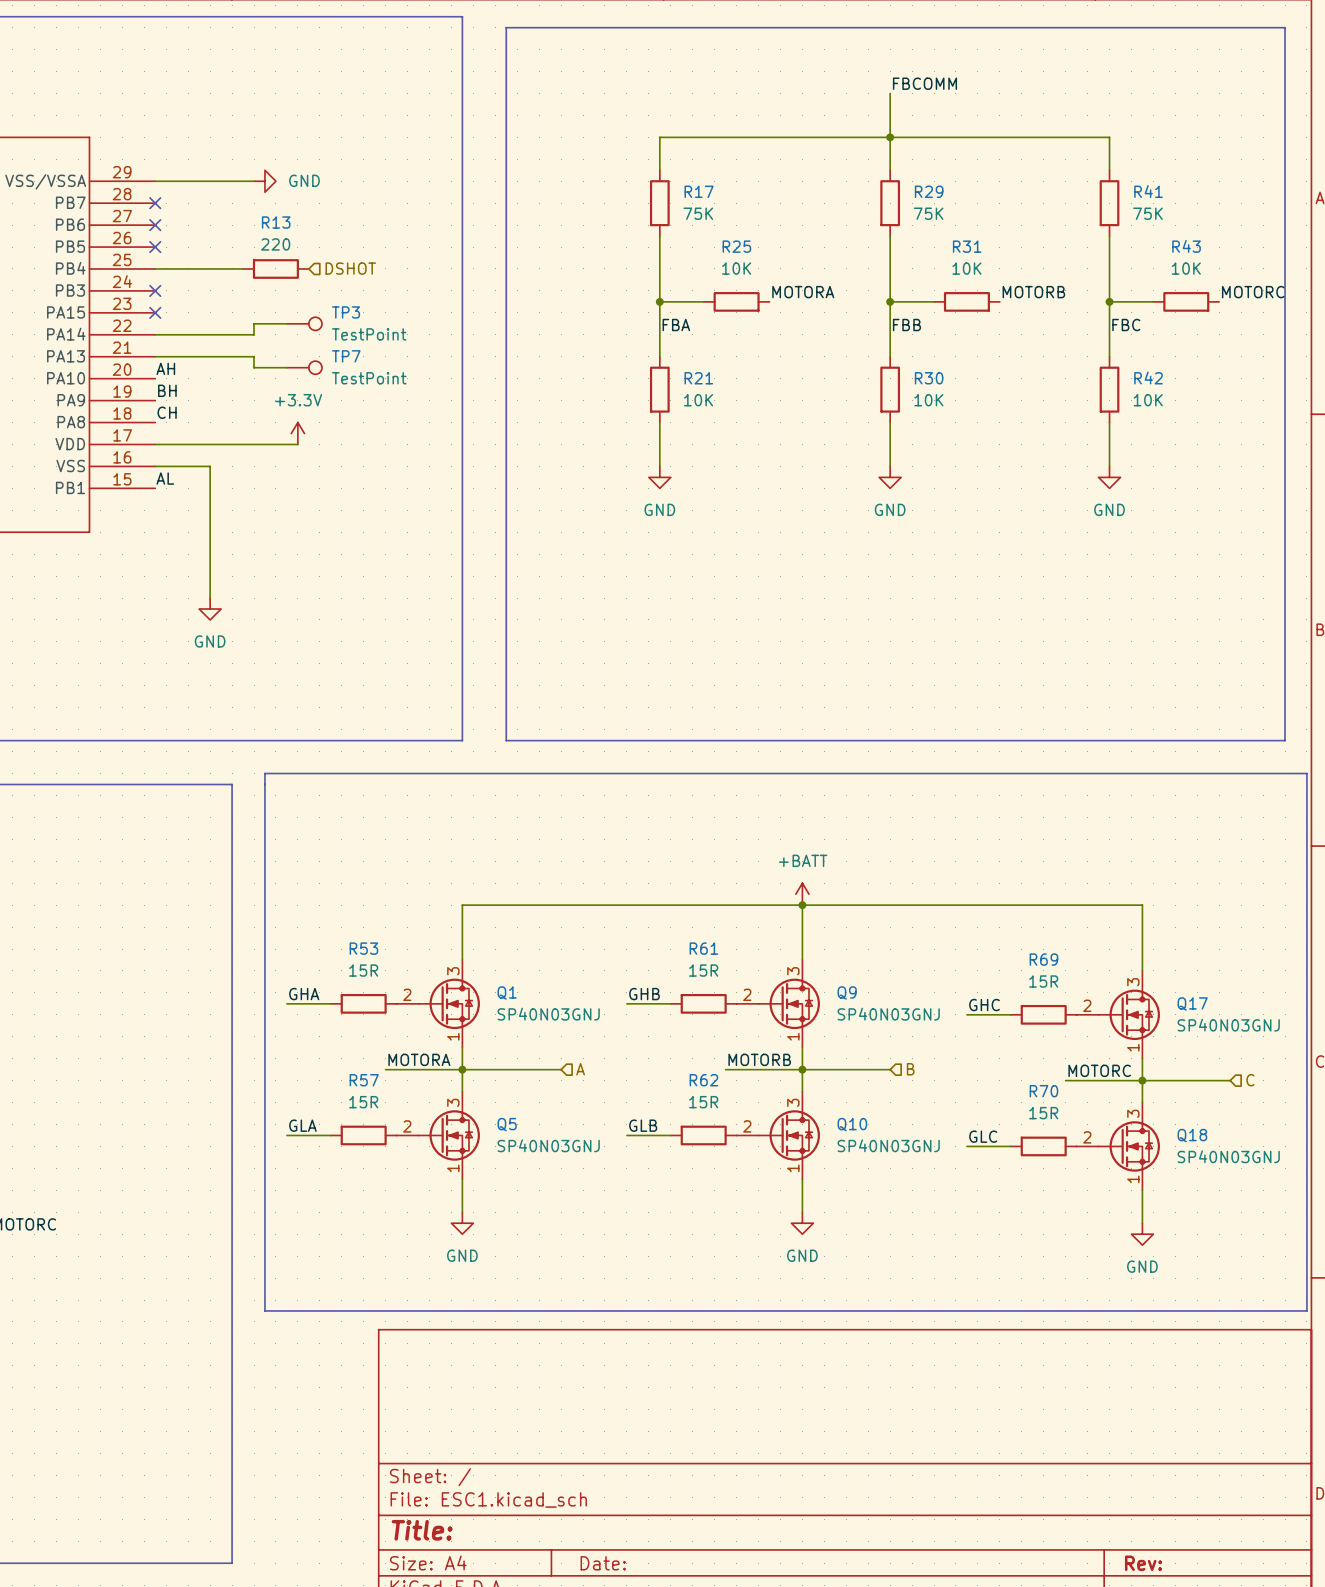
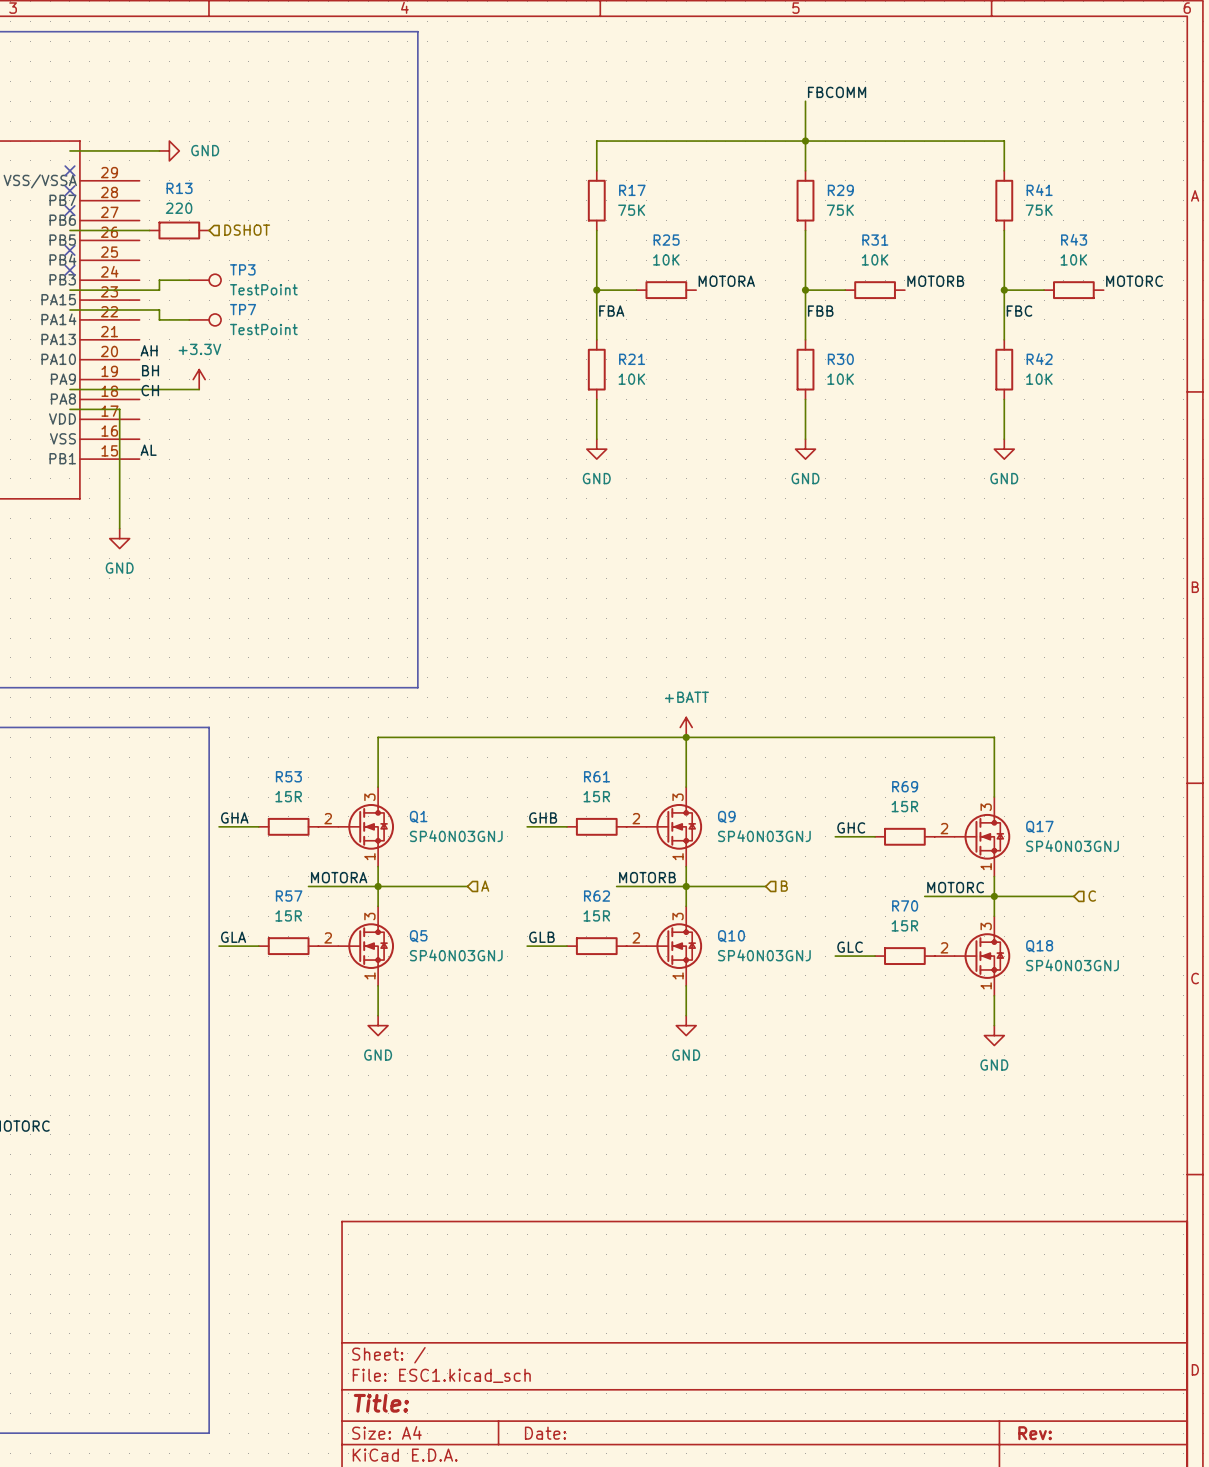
line: (506, 27) (506, 740) (1285, 740) (1285, 27) (506, 27) -> none
no-connect mark: none -> (69, 170)
wire: (155, 181) (254, 181) -> (69, 150) (159, 150)
power symbol position: GND (264, 181) -> GND (169, 150)
no-connect mark: none -> (69, 190)
no-connect mark: (155, 203) -> none
no-connect mark: none -> (69, 210)
no-connect mark: (155, 225) -> none
no-connect mark: (155, 247) -> none
no-connect mark: none -> (69, 250)
wire: (155, 268) (243, 268) -> (69, 230) (149, 230)
R13 position: (275, 268) -> (179, 230)
hierarchical label position: DSHOT (350, 268) -> DSHOT (247, 230)
no-connect mark: none -> (69, 270)
no-connect mark: (155, 290) -> none
wire: none -> (189, 280) (159, 280) (159, 290) (69, 290)
no-connect mark: (155, 312) -> none
wire: (286, 323) (254, 323) (254, 334) (210, 334) -> none
TP3 position: (304, 323) -> (205, 280)
wire: (155, 334) (177, 334) -> (69, 310) (159, 310) (159, 319)
wire: (155, 356) (254, 356) (254, 367) (286, 367) -> none
TP7 position: (304, 367) -> (205, 319)
power symbol position: +3.3V (297, 433) -> +3.3V (199, 379)
wire: (155, 444) (297, 444) -> (69, 389) (199, 389)
wire: (155, 466) (210, 466) (210, 598) -> (69, 409) (119, 409) (119, 528)
power symbol position: GND (210, 609) -> GND (119, 538)
line: (264, 773) (1306, 773) (1306, 1310) (264, 1310) (264, 773) -> none
junction: none -> (686, 737)
wire: none -> (378, 787) (378, 737) (994, 737) (994, 797)
power symbol position: +BATT (802, 894) -> +BATT (686, 727)
wire: (802, 905) (802, 959) -> (686, 737) (686, 787)
junction: (802, 905) -> none
wire: (923, 905) (462, 905) (462, 959) -> none
wire: (966, 905) (1142, 905) (1142, 970) -> none
junction: none -> (378, 886)
junction: none -> (686, 886)
junction: none -> (994, 896)
label position: GHA (304, 994) -> GHA (234, 817)
label position: GHB (644, 994) -> GHB (543, 817)
wire: (286, 1003) (330, 1003) -> (219, 826) (258, 826)
R53 position: (363, 1003) -> (288, 826)
Q1 position: (438, 1003) -> (356, 826)
wire: (626, 1003) (670, 1003) -> (527, 826) (566, 826)
R61 position: (703, 1003) -> (596, 826)
Q9 position: (778, 1003) -> (664, 826)
label position: GHC (984, 1005) -> GHC (851, 827)
wire: (966, 1014) (1010, 1014) -> none
R69 position: (1043, 1014) -> (904, 836)
Q17 position: (1118, 1014) -> (972, 836)
wire: (462, 1047) (462, 1091) -> (378, 866) (378, 906)
wire: (802, 1047) (802, 1091) -> (686, 866) (686, 906)
wire: (1142, 1058) (1142, 1102) -> (994, 876) (994, 916)
label position: MOTORA (419, 1059) -> MOTORA (339, 877)
label position: MOTORB (759, 1059) -> MOTORB (647, 877)
wire: (385, 1069) (561, 1069) -> (308, 886) (467, 886)
junction: (462, 1069) -> none
hierarchical label position: A (580, 1069) -> A (485, 886)
wire: (725, 1069) (890, 1069) -> (616, 886) (765, 886)
junction: (802, 1069) -> none
hierarchical label position: B (910, 1069) -> B (784, 886)
label position: MOTORC (1099, 1070) -> MOTORC (955, 887)
wire: (1065, 1080) (1230, 1080) -> (924, 896) (1073, 896)
junction: (1142, 1080) -> none
hierarchical label position: C (1250, 1080) -> C (1092, 896)
label position: GLA (302, 1125) -> GLA (233, 937)
label position: GLB (643, 1125) -> GLB (541, 937)
wire: (286, 1135) (330, 1135) -> (219, 946) (258, 946)
R57 position: (363, 1135) -> (288, 946)
Q5 position: (438, 1135) -> (356, 946)
wire: (626, 1135) (670, 1135) -> (527, 946) (566, 946)
R62 position: (703, 1135) -> (596, 946)
Q10 position: (778, 1135) -> (664, 946)
label position: GLC (983, 1136) -> GLC (850, 947)
wire: (966, 1146) (1010, 1146) -> (835, 956) (875, 956)
R70 position: (1043, 1146) -> (904, 956)
Q18 position: (1118, 1146) -> (972, 956)
wire: (462, 1179) (462, 1212) -> (378, 985) (378, 1015)
wire: (802, 1179) (802, 1212) -> (686, 985) (686, 1015)
wire: (1142, 1190) (1142, 1223) -> (994, 995) (994, 1025)
power symbol position: GND (462, 1223) -> GND (378, 1025)
power symbol position: GND (802, 1223) -> GND (686, 1025)
power symbol position: GND (1142, 1234) -> GND (994, 1035)

